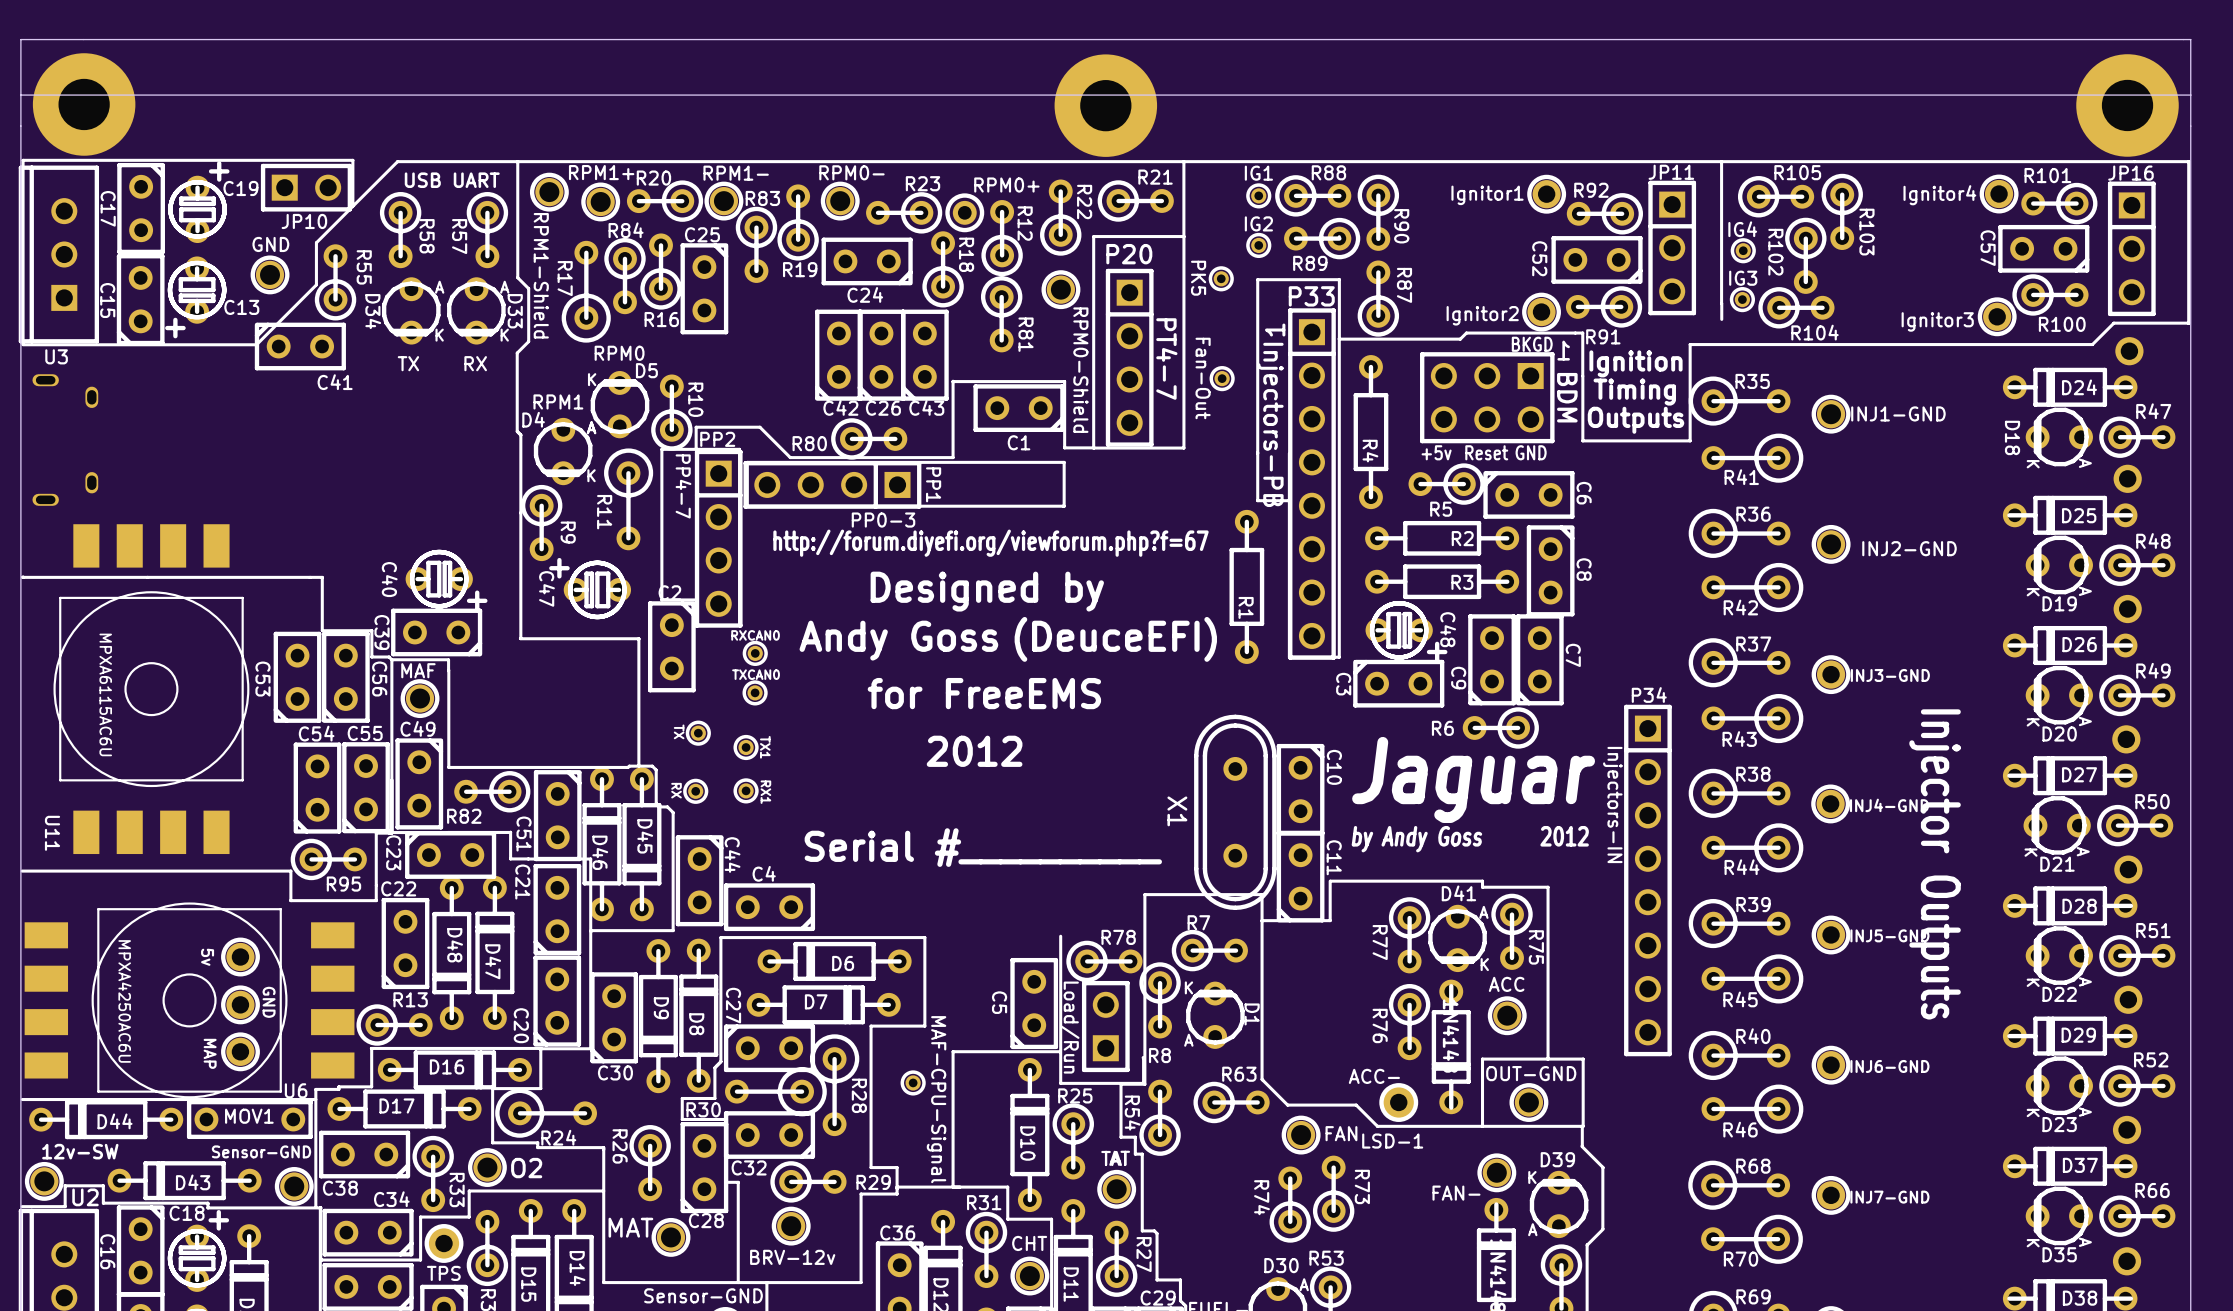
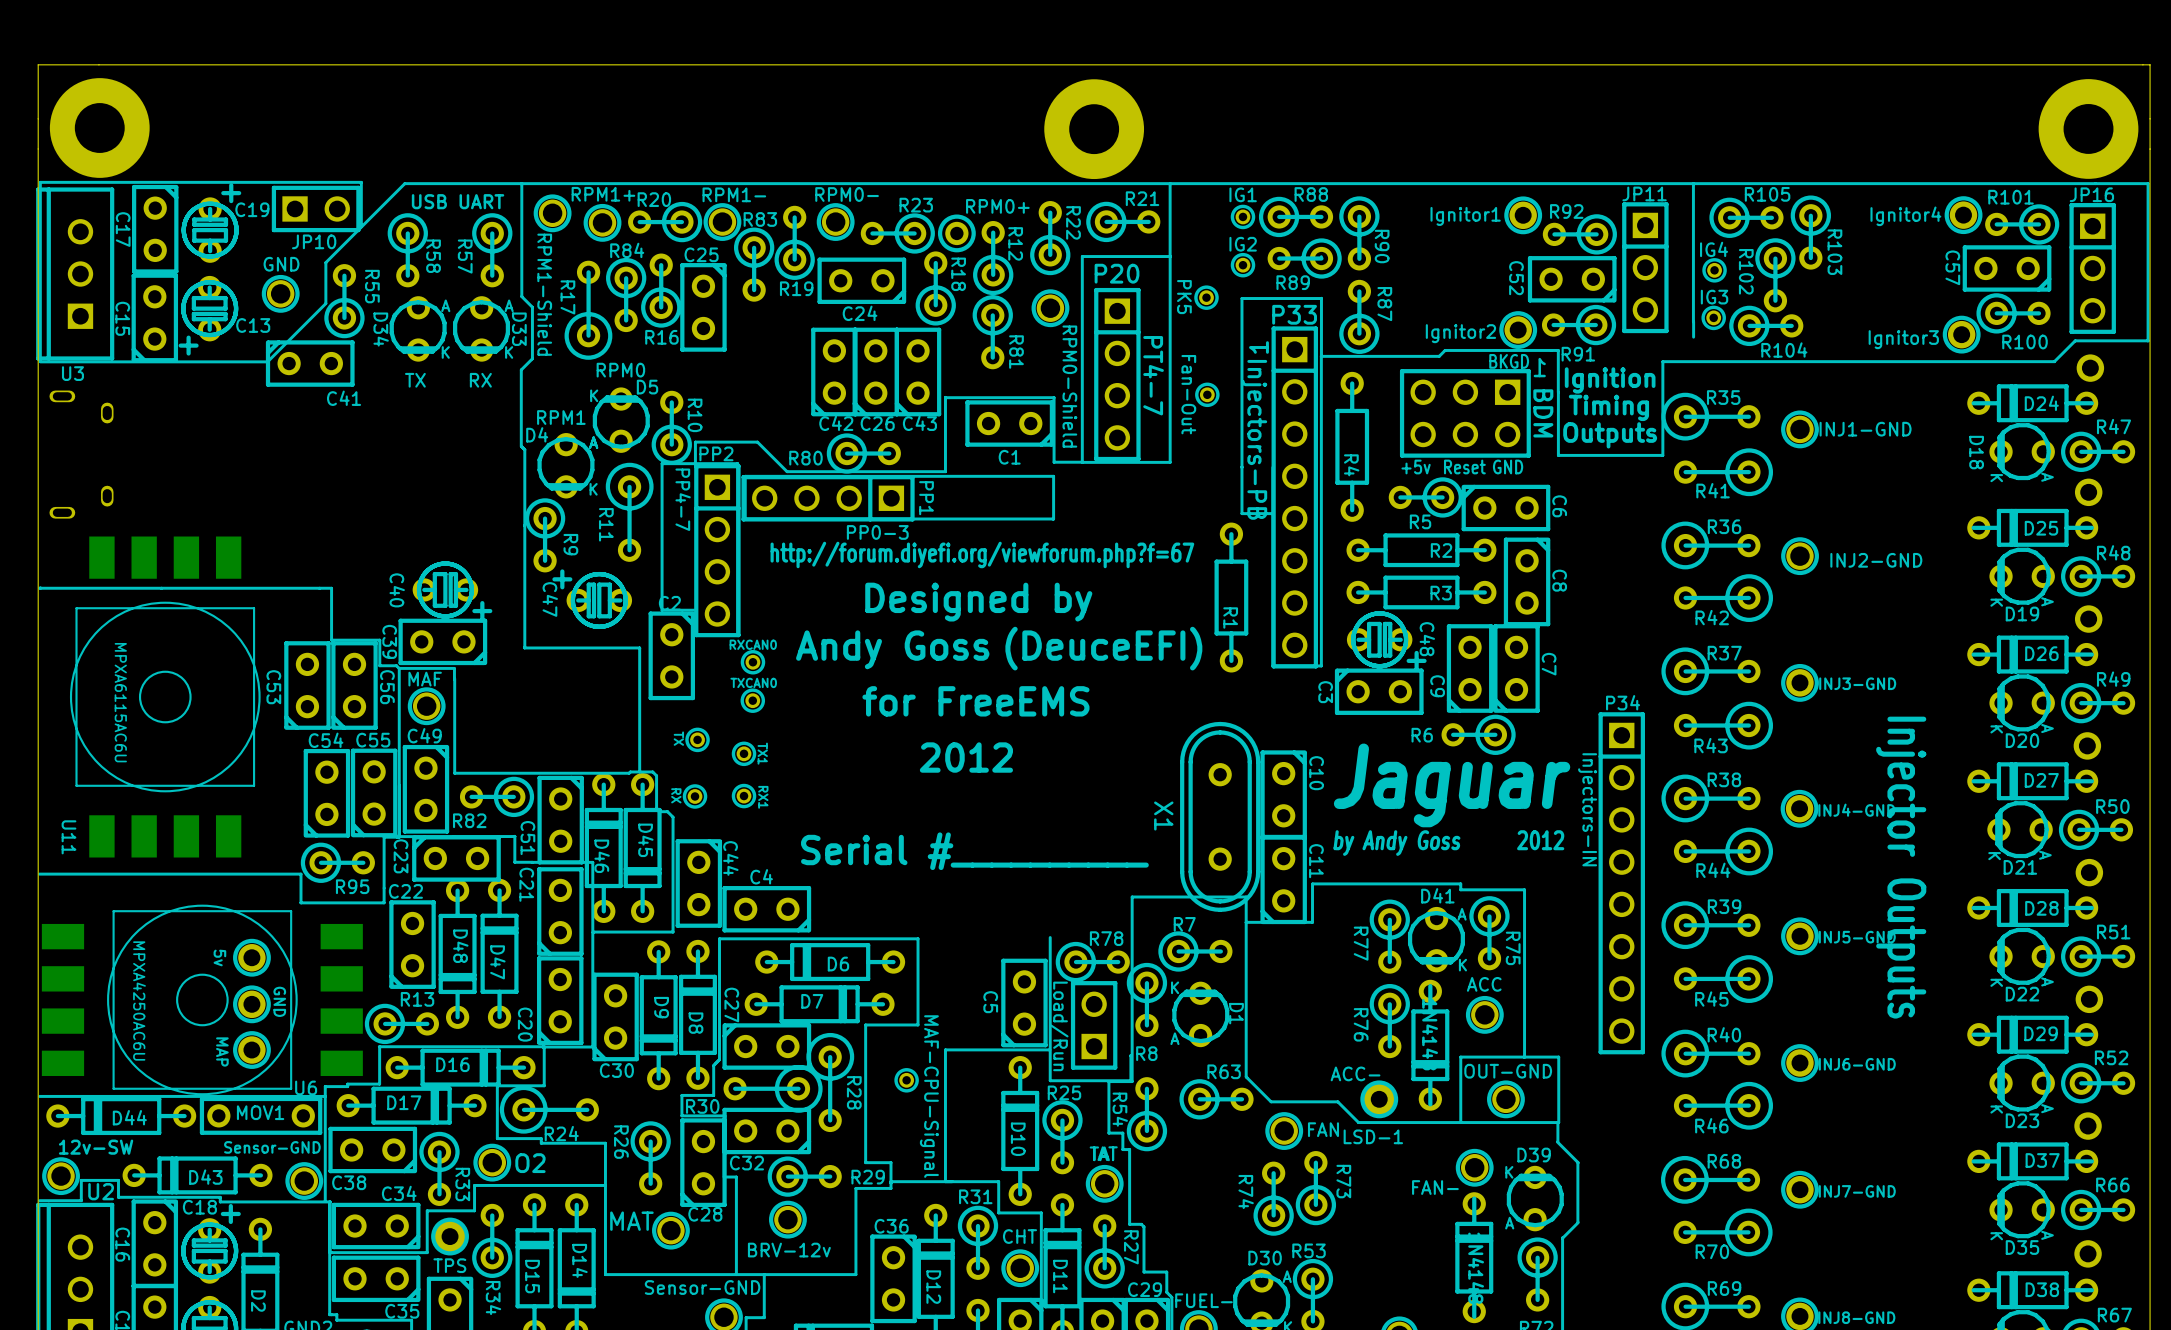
board edge: (2190, 95) (20, 95) -> none

